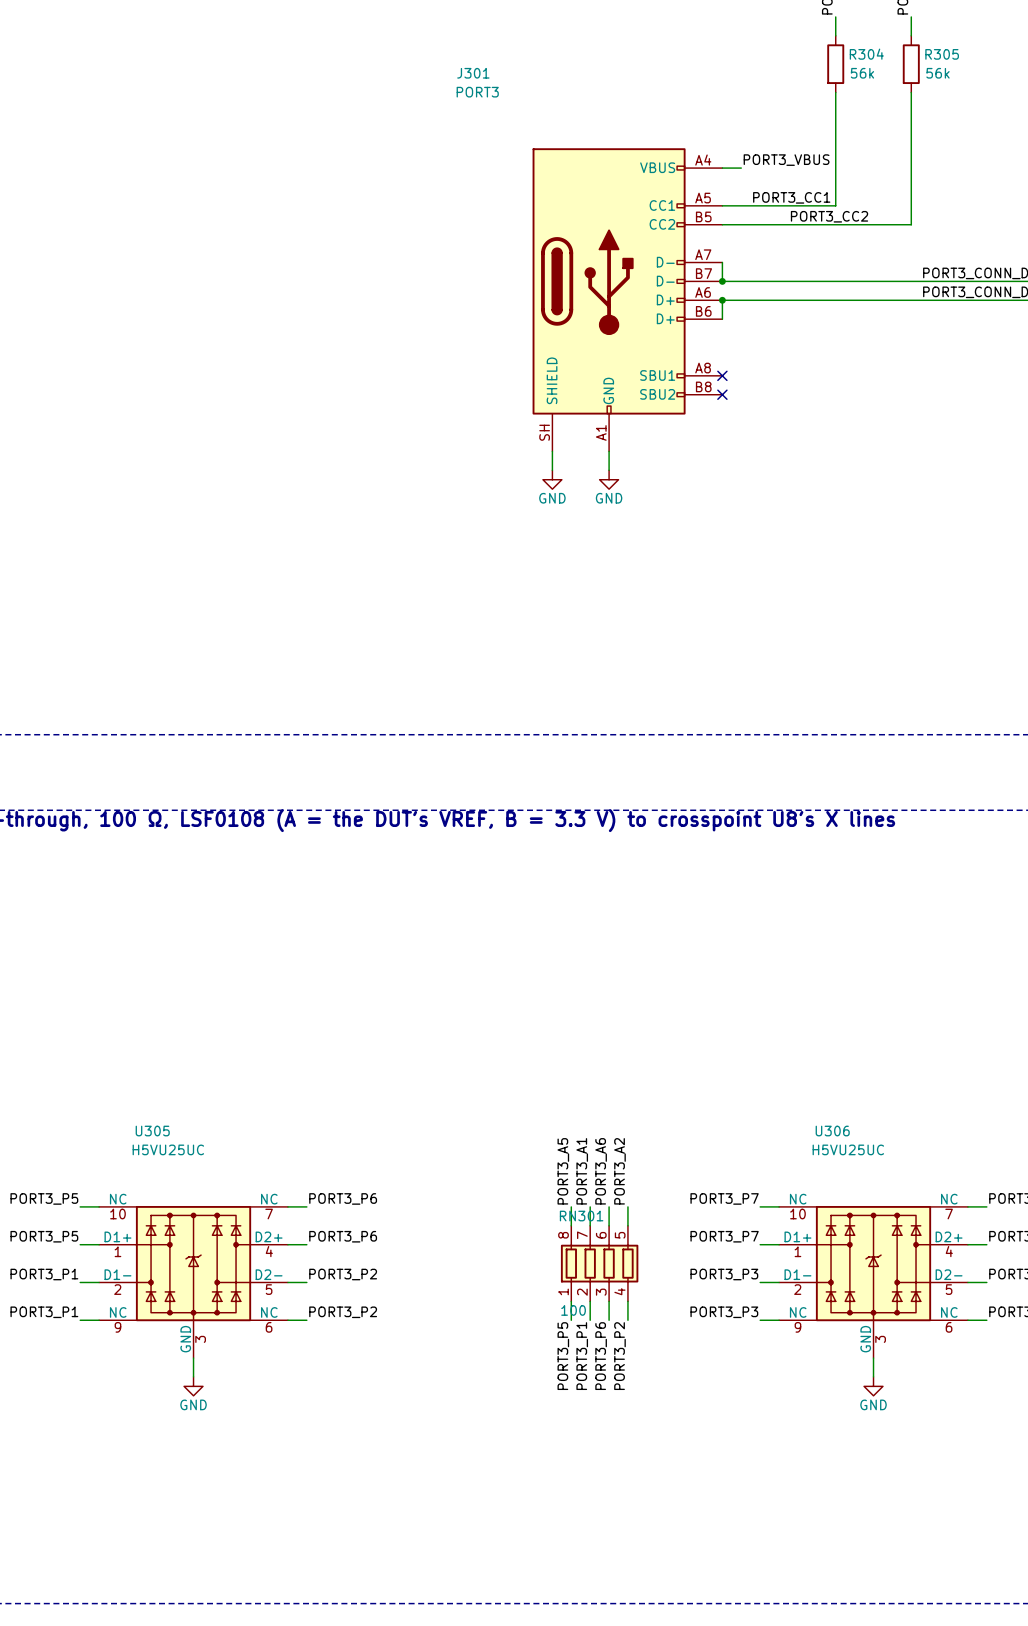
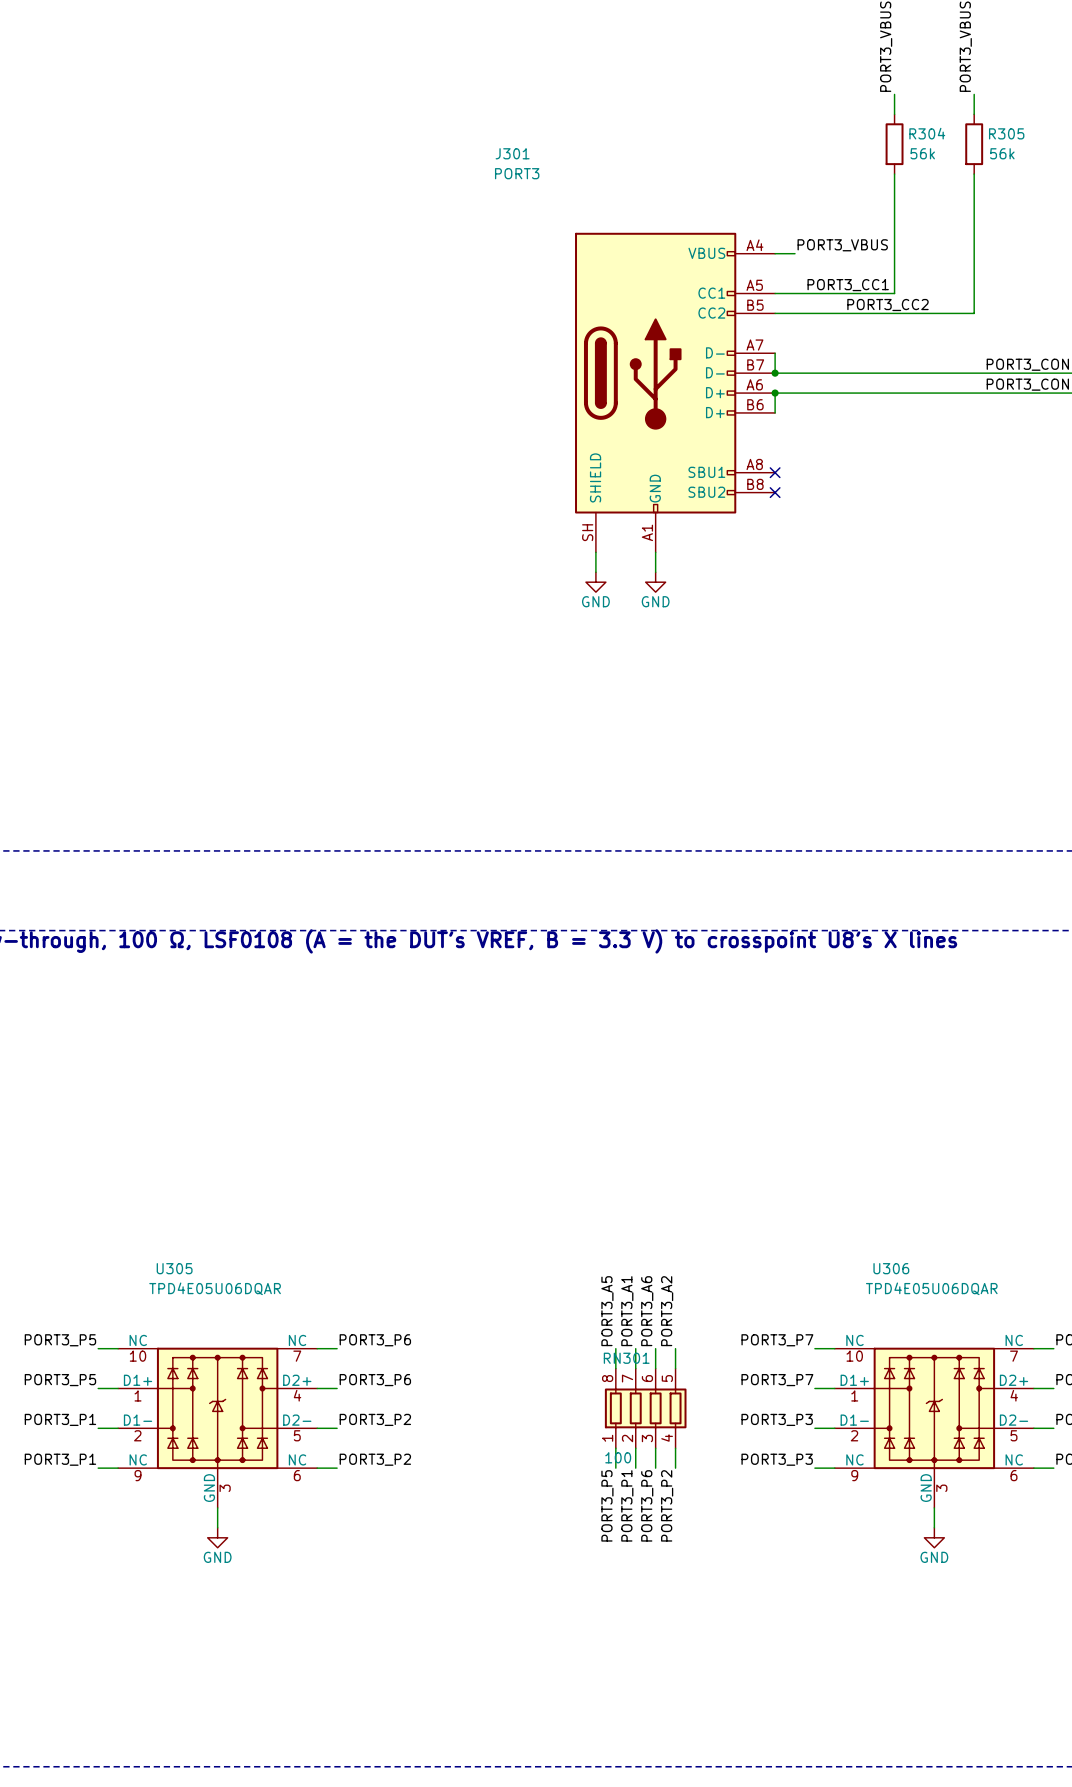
U305 value: H5VU25UC (168, 1149) -> TPD4E05U06DQAR (215, 1288)
U306 value: H5VU25UC (848, 1149) -> TPD4E05U06DQAR (931, 1288)

